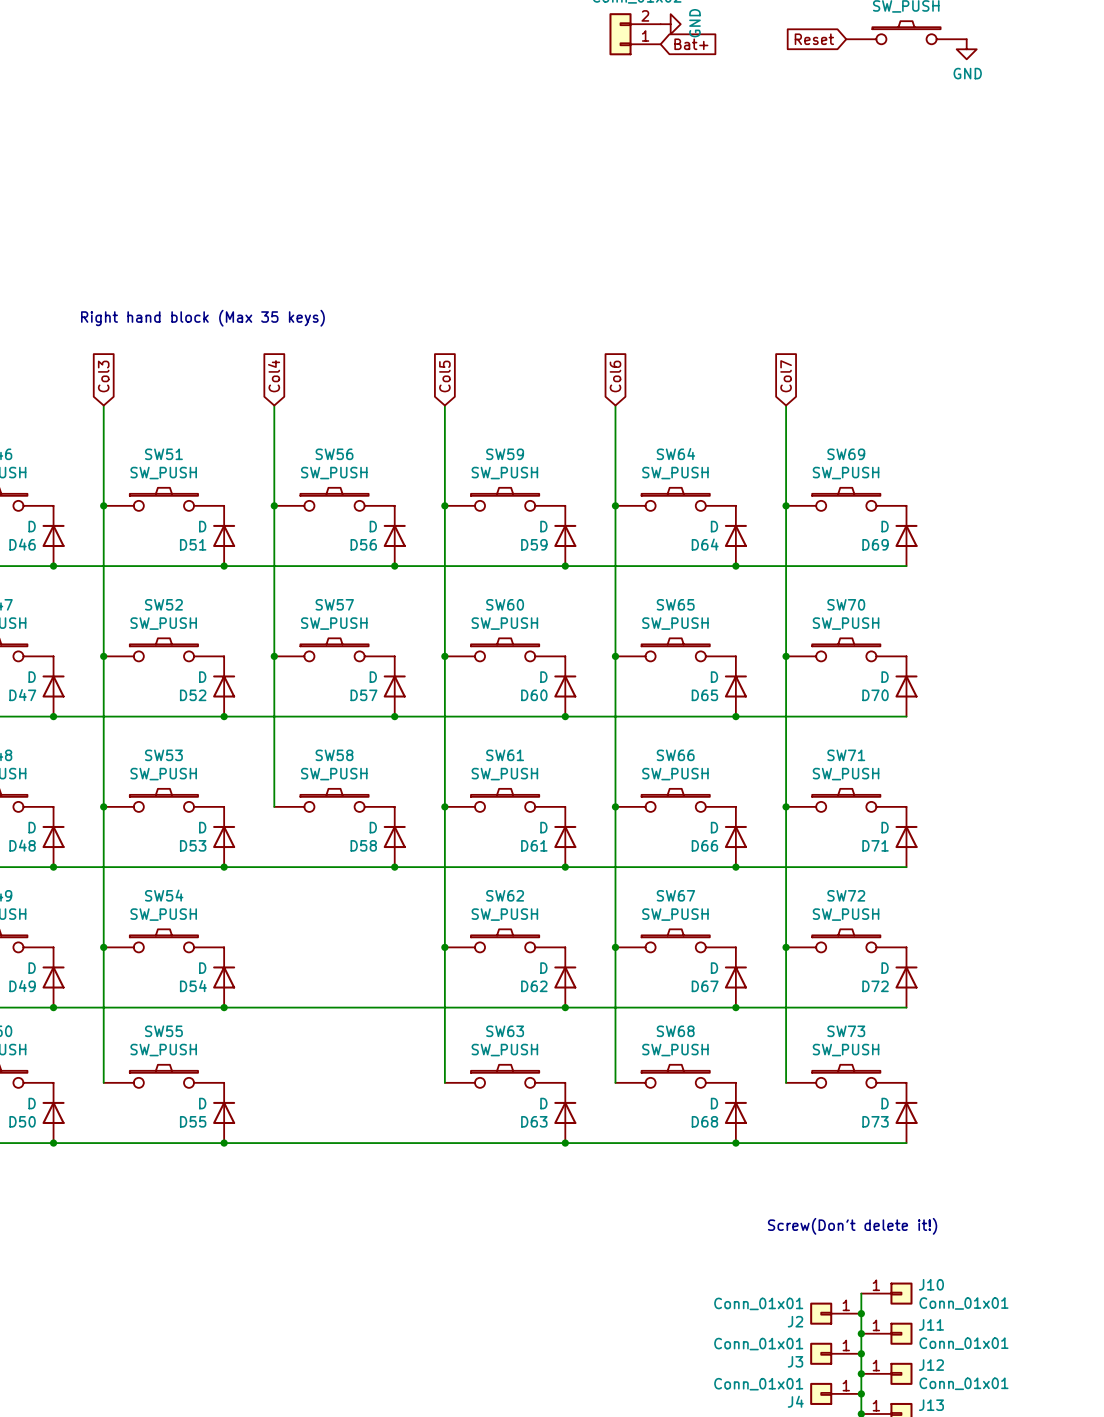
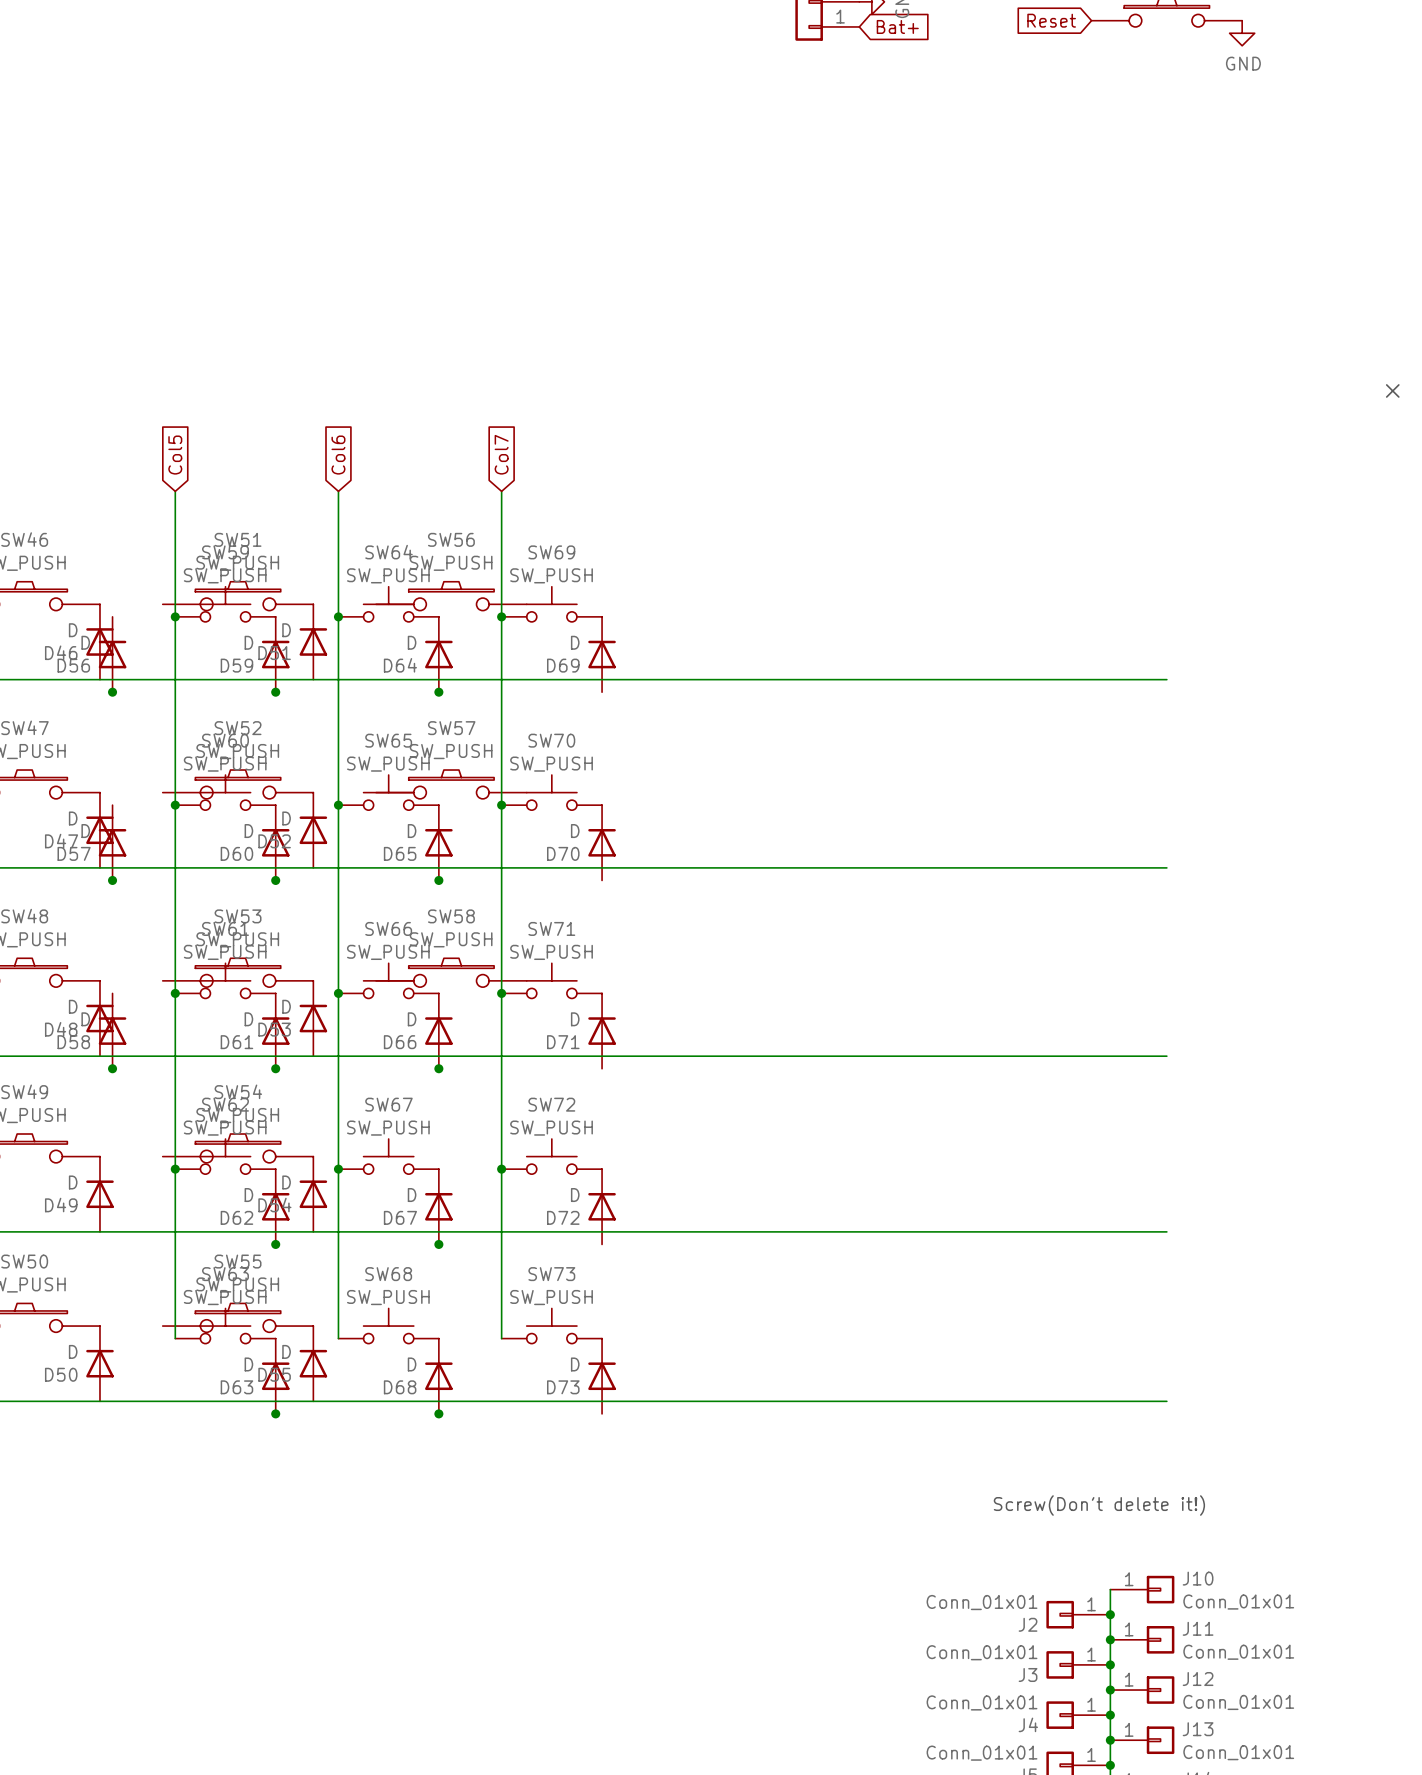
text: Right hand block (Max 35 keys) (202, 318) -> none
no-connect mark: none -> (1392, 390)
global label: Col3 (103, 376) -> Col5 (175, 455)
global label: Col4 (274, 376) -> none
global label: Col5 (444, 376) -> none
global label: Col6 (615, 376) -> none
global label: Col7 (786, 376) -> none
global label: none -> Col6 (338, 455)
global label: none -> Col7 (501, 454)
wire: (103, 405) (103, 1082) -> (175, 491) (175, 1338)
wire: (274, 405) (274, 806) -> none
wire: (444, 405) (444, 1082) -> (501, 491) (501, 1338)
wire: (615, 405) (615, 1082) -> none
wire: (786, 405) (786, 1082) -> none
wire: none -> (338, 491) (338, 1338)
SW59 symbol: [444, 487, 566, 511] -> [175, 586, 276, 622]
SW64 symbol: [615, 487, 736, 511] -> [338, 586, 439, 622]
SW69 symbol: [786, 487, 907, 511] -> [501, 586, 603, 622]
junction position: (103, 505) -> (175, 616)
junction: (274, 505) -> none
junction: (444, 505) -> none
junction: (615, 505) -> none
junction: (786, 505) -> none
junction: none -> (338, 616)
junction: none -> (501, 616)
D56 position: (394, 535) -> (112, 654)
D59 position: (565, 535) -> (275, 654)
D64 position: (735, 535) -> (438, 654)
D69 position: (906, 535) -> (602, 654)
junction position: (53, 566) -> (112, 692)
junction: (224, 566) -> none
junction: (394, 566) -> none
junction: (565, 566) -> none
junction: (735, 566) -> none
junction: none -> (275, 692)
junction: none -> (438, 692)
SW60 symbol: [444, 638, 566, 662] -> [175, 775, 276, 811]
SW65 symbol: [615, 638, 736, 662] -> [338, 775, 439, 811]
SW70 symbol: [786, 638, 907, 662] -> [501, 775, 603, 811]
junction position: (103, 656) -> (175, 805)
junction: (274, 656) -> none
junction: (444, 656) -> none
junction: (615, 656) -> none
junction: (786, 656) -> none
junction: none -> (338, 805)
junction: none -> (501, 805)
D57 position: (394, 686) -> (112, 842)
D60 position: (565, 686) -> (275, 842)
D65 position: (735, 686) -> (438, 842)
D70 position: (906, 686) -> (602, 842)
junction position: (53, 716) -> (112, 880)
junction: (224, 716) -> none
junction: (394, 716) -> none
junction: (565, 716) -> none
junction: (735, 716) -> none
junction: none -> (275, 880)
junction: none -> (438, 880)
SW61 symbol: [444, 788, 566, 812] -> [175, 963, 276, 999]
SW66 symbol: [615, 788, 736, 812] -> [338, 963, 439, 999]
SW71 symbol: [786, 788, 907, 812] -> [501, 963, 603, 999]
junction position: (103, 806) -> (175, 993)
junction: (444, 806) -> none
junction: (615, 806) -> none
junction: (786, 806) -> none
junction: none -> (338, 993)
junction: none -> (501, 993)
D58 position: (394, 837) -> (112, 1031)
D61 position: (565, 837) -> (275, 1031)
D66 position: (735, 837) -> (438, 1031)
D71 position: (906, 837) -> (602, 1031)
junction position: (53, 867) -> (112, 1068)
junction: (224, 867) -> none
junction: (394, 867) -> none
junction: (565, 867) -> none
junction: (735, 867) -> none
junction: none -> (275, 1068)
junction: none -> (438, 1068)
SW62 symbol: [444, 929, 566, 953] -> [175, 1139, 276, 1175]
SW67 symbol: [615, 929, 736, 953] -> [338, 1139, 439, 1175]
SW72 symbol: [786, 929, 907, 953] -> [501, 1139, 603, 1175]
junction position: (103, 947) -> (175, 1169)
junction: (444, 947) -> none
junction: (615, 947) -> none
junction: (786, 947) -> none
junction: none -> (338, 1169)
junction: none -> (501, 1169)
D62 position: (565, 977) -> (275, 1206)
D67 position: (735, 977) -> (438, 1206)
D72 position: (906, 977) -> (602, 1206)
junction: (53, 1007) -> none
junction: (224, 1007) -> none
junction: (565, 1007) -> none
junction: (735, 1007) -> none
junction: none -> (275, 1244)
junction: none -> (438, 1244)
SW63 symbol: [444, 1064, 566, 1088] -> [175, 1308, 276, 1344]
SW68 symbol: [615, 1064, 736, 1088] -> [338, 1308, 439, 1344]
SW73 symbol: [786, 1064, 907, 1088] -> [501, 1308, 603, 1344]
D63 position: (565, 1112) -> (275, 1376)
D68 position: (735, 1112) -> (438, 1376)
D73 position: (906, 1112) -> (602, 1376)
junction: (53, 1143) -> none
junction position: (224, 1143) -> (275, 1413)
junction: (565, 1143) -> none
junction: (735, 1143) -> none
junction: none -> (438, 1413)

